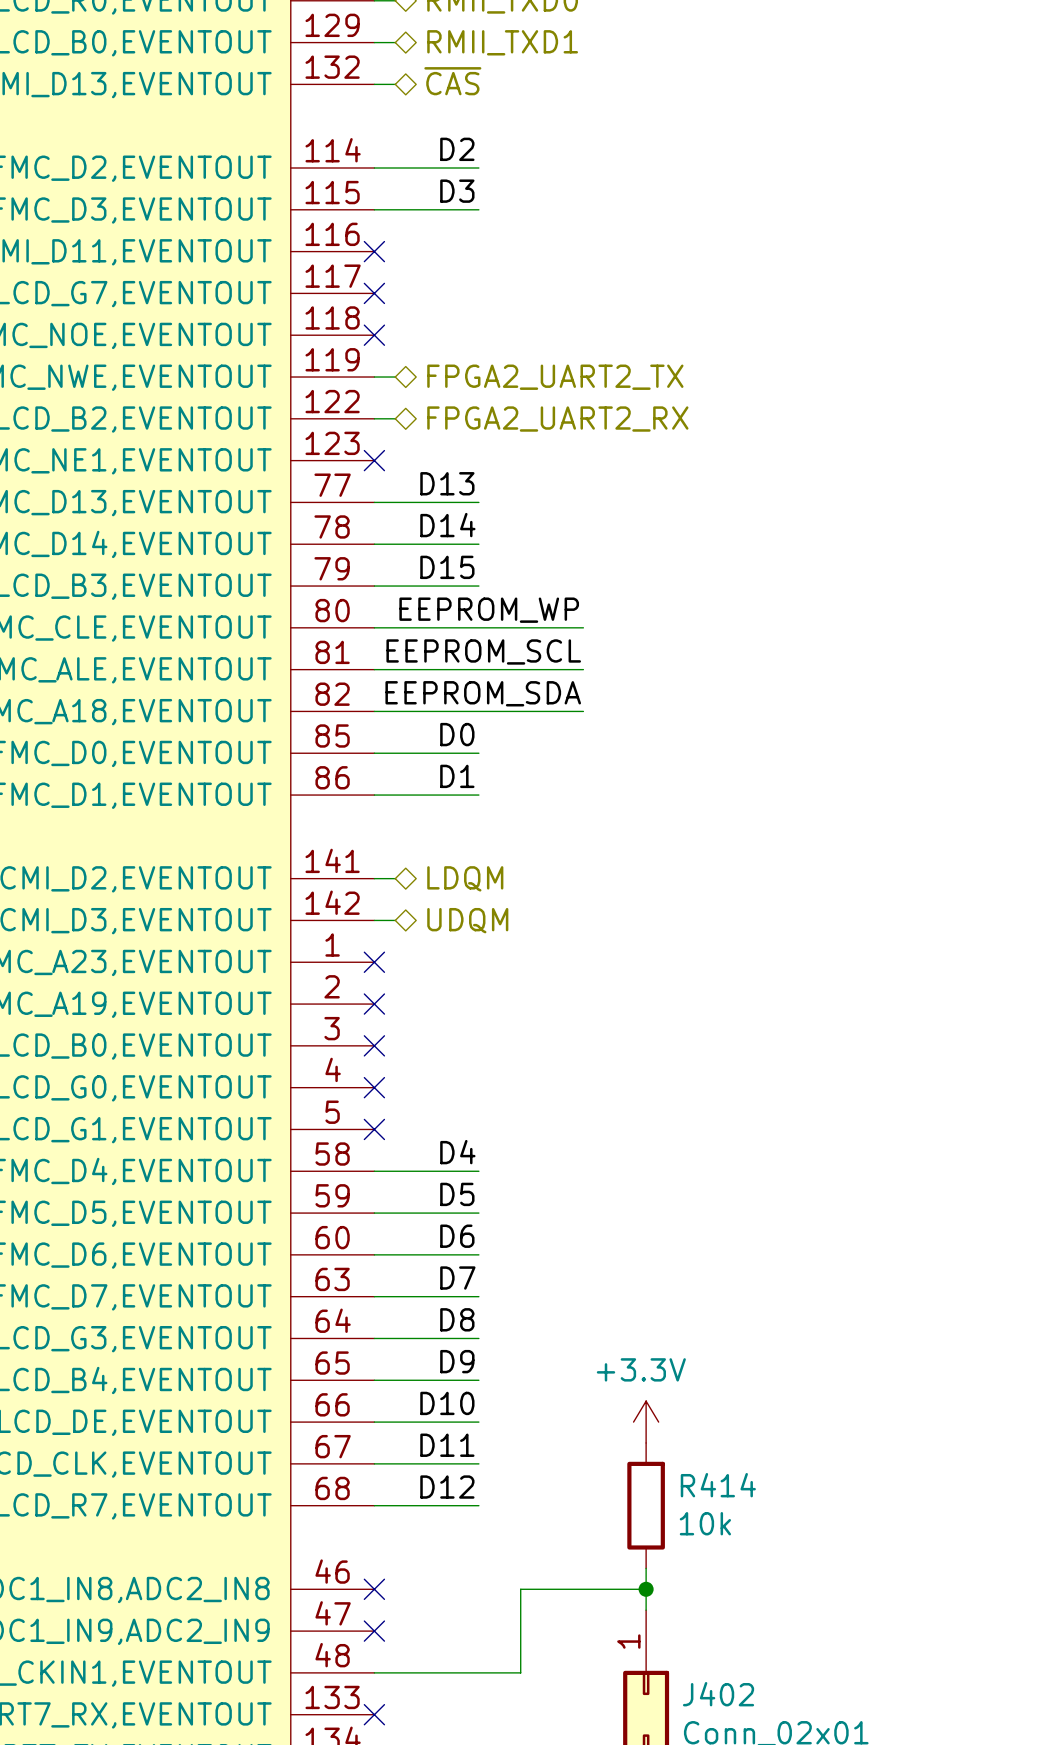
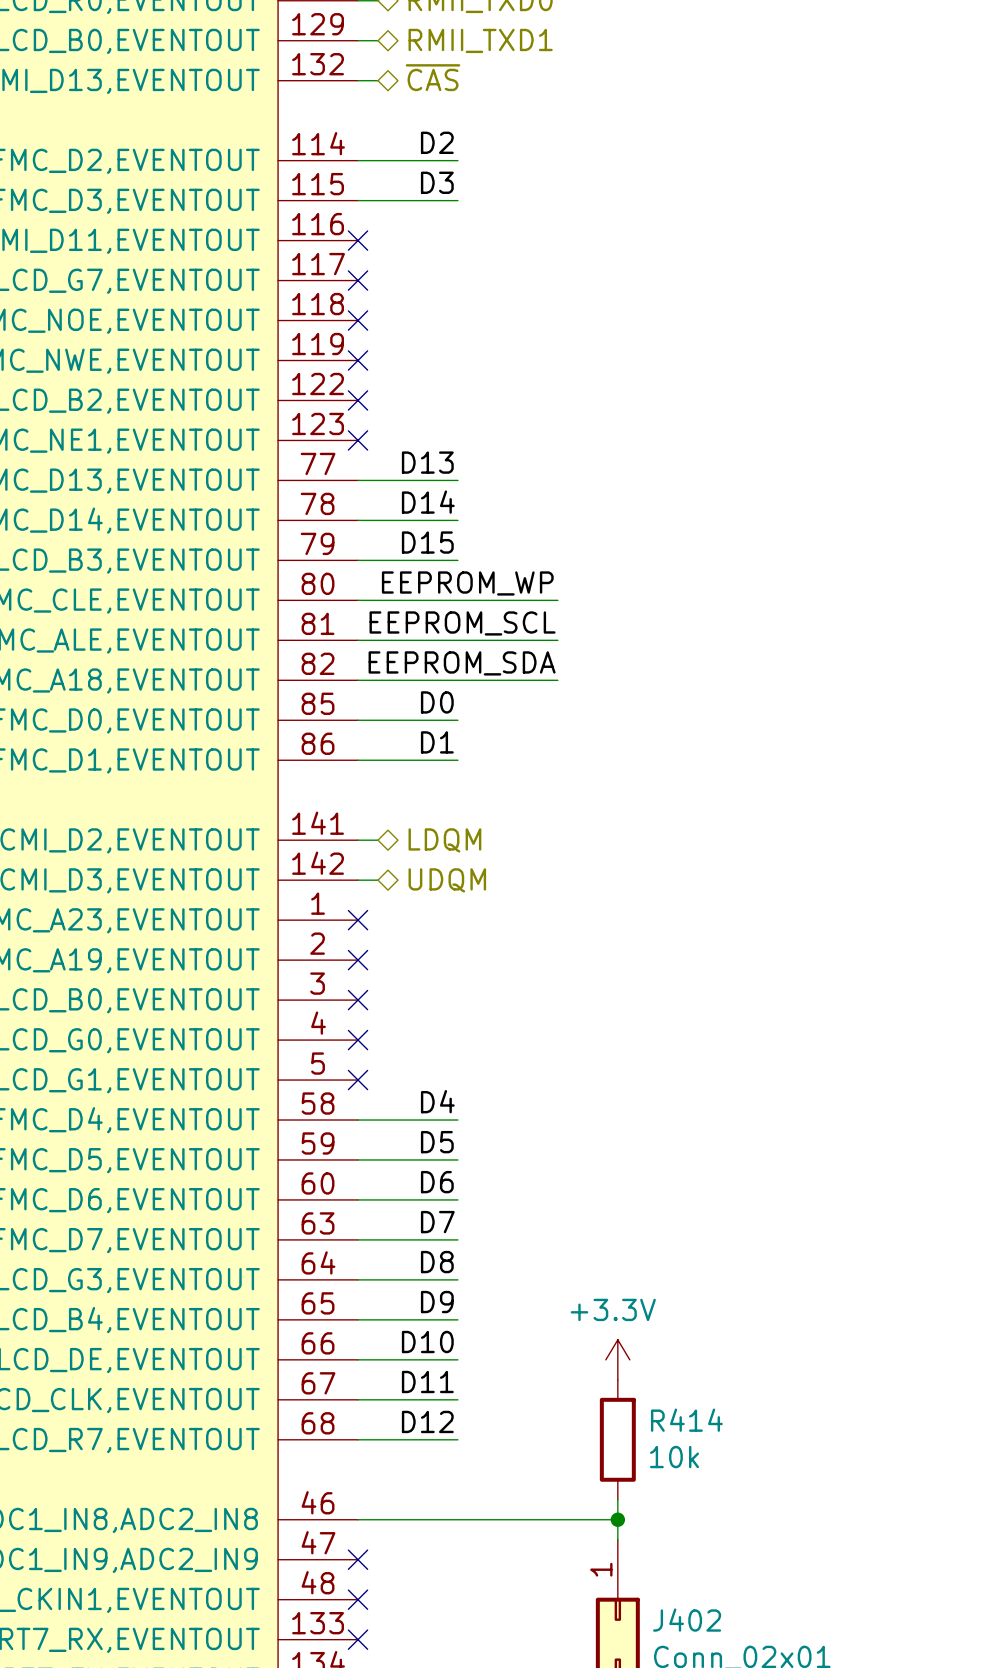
wire: (374, 377) (395, 377) -> none
no-connect mark: none -> (358, 360)
hierarchical label: FPGA2_UART2_TX (555, 377) -> none
wire: (374, 418) (395, 418) -> none
no-connect mark: none -> (358, 400)
hierarchical label: FPGA2_UART2_RX (557, 419) -> none
no-connect mark position: (374, 1589) -> (358, 1599)
wire: (520, 1589) (520, 1672) (374, 1672) -> (497, 1519) (358, 1519)

